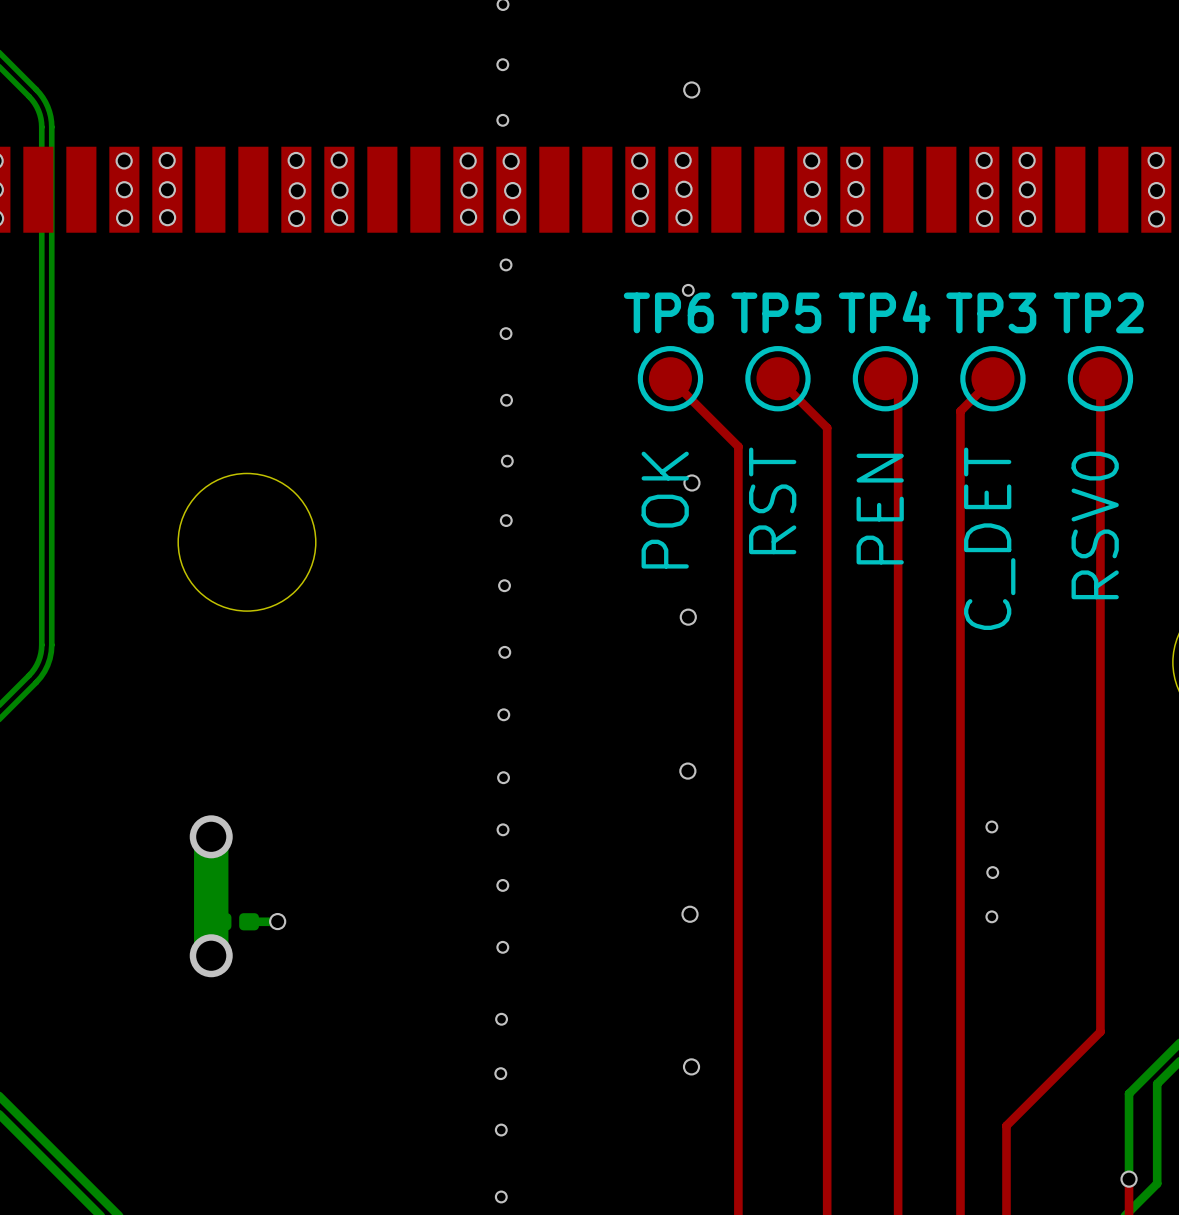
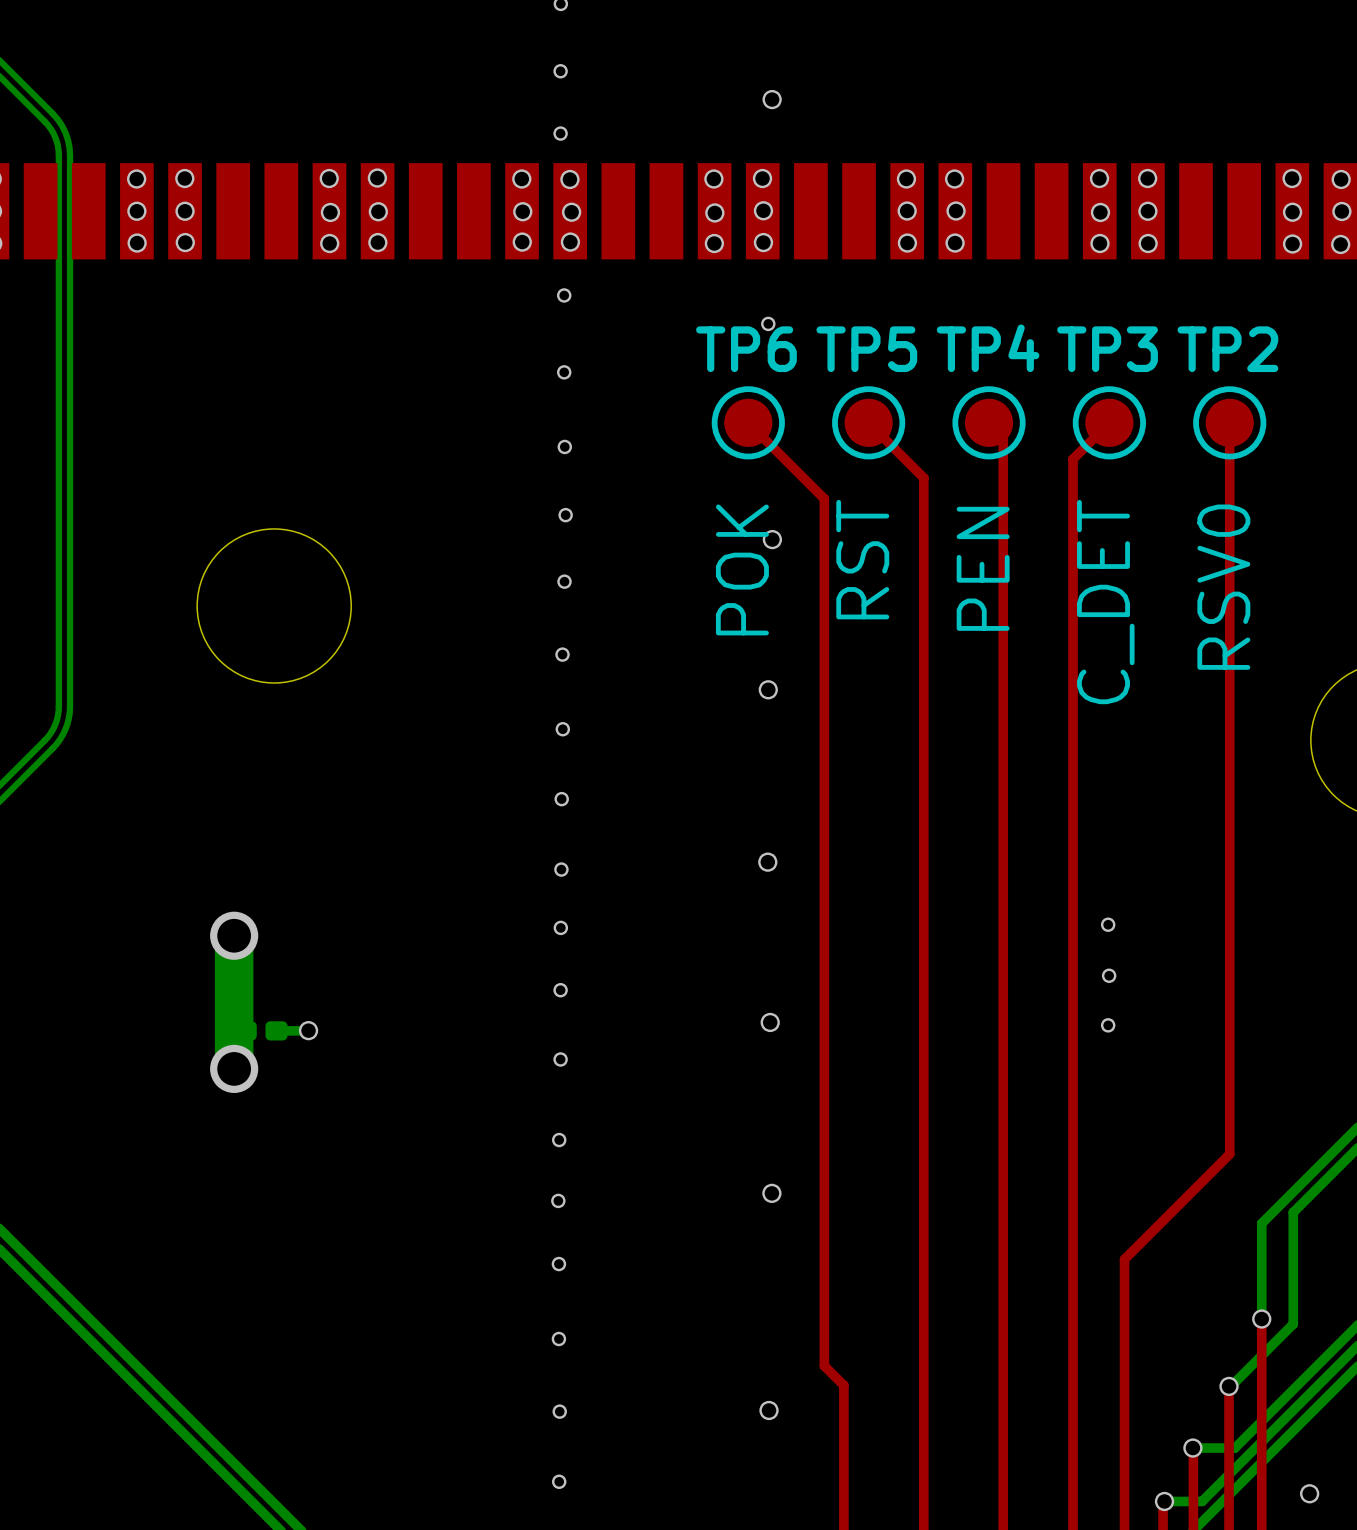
bottom track: (36, 89) (47, 106) (51, 127) (51, 644) (47, 665) (36, 682) -> (38, 99) (62, 125) (68, 140) (70, 155) (70, 706) (67, 723) (63, 734) (38, 762)
bottom track: (29, 96) (38, 110) (41, 127) (41, 644) (38, 661) (29, 675) -> (30, 107) (53, 132) (58, 155) (58, 706) (53, 729) (30, 755)

